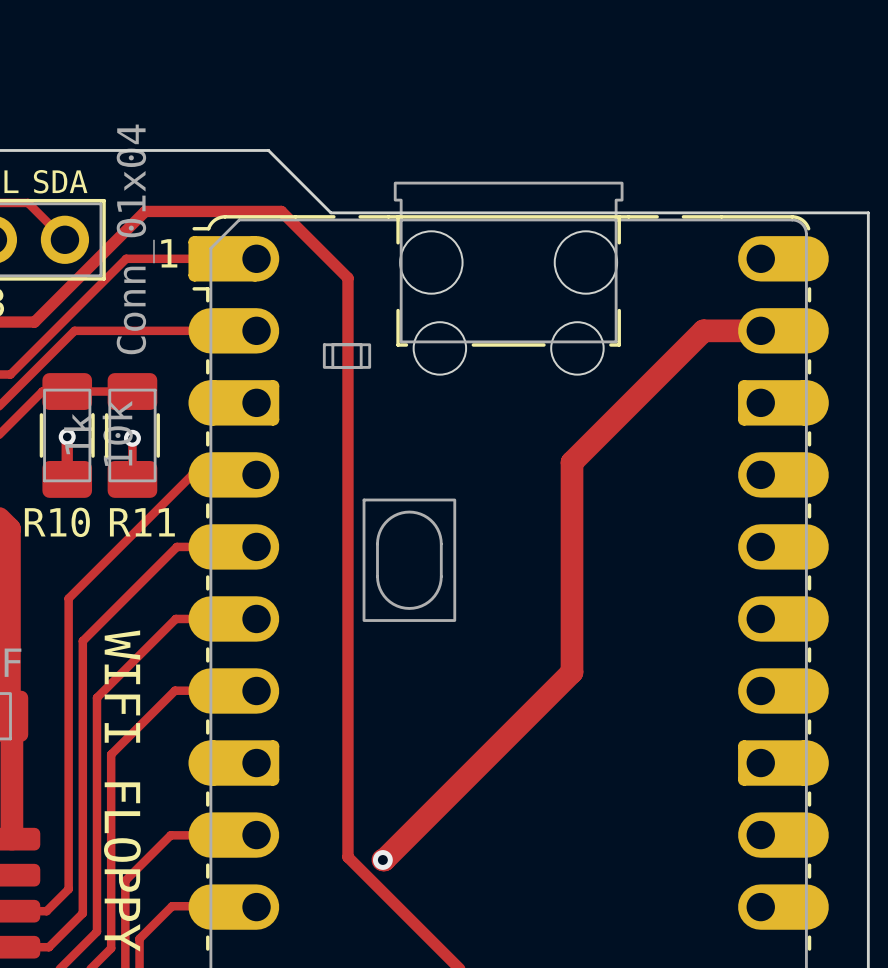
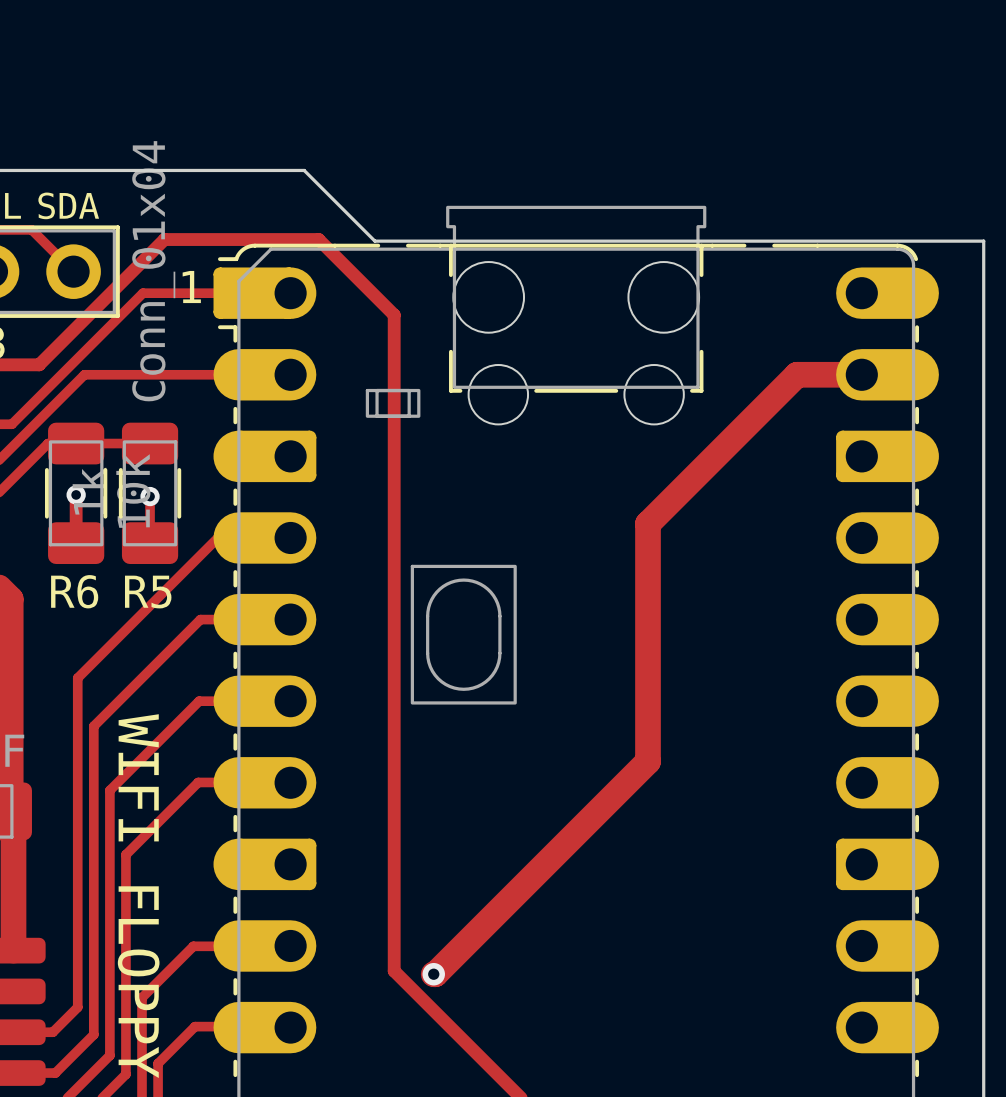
R10 name: R10 (57, 522) -> R6 (74, 591)
R11 name: R11 (142, 522) -> R5 (148, 592)

